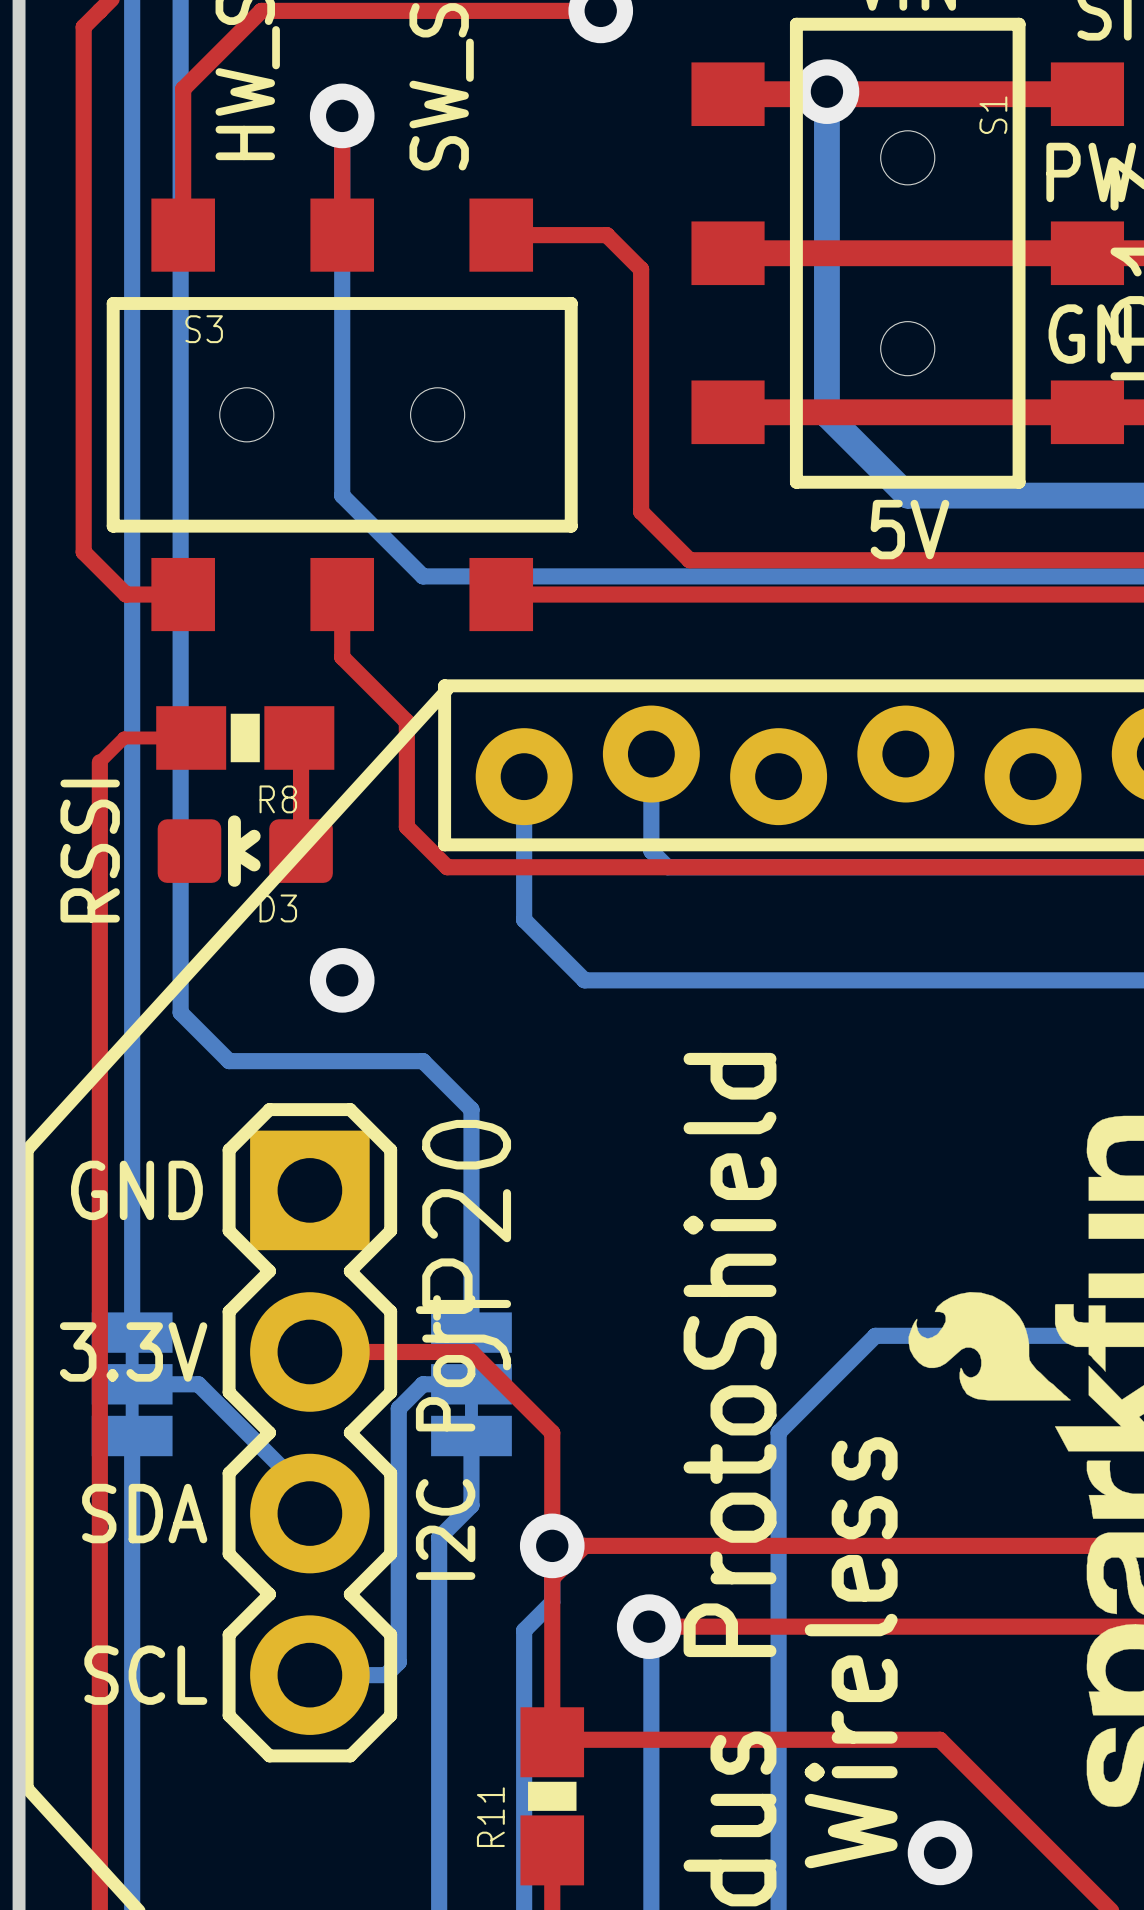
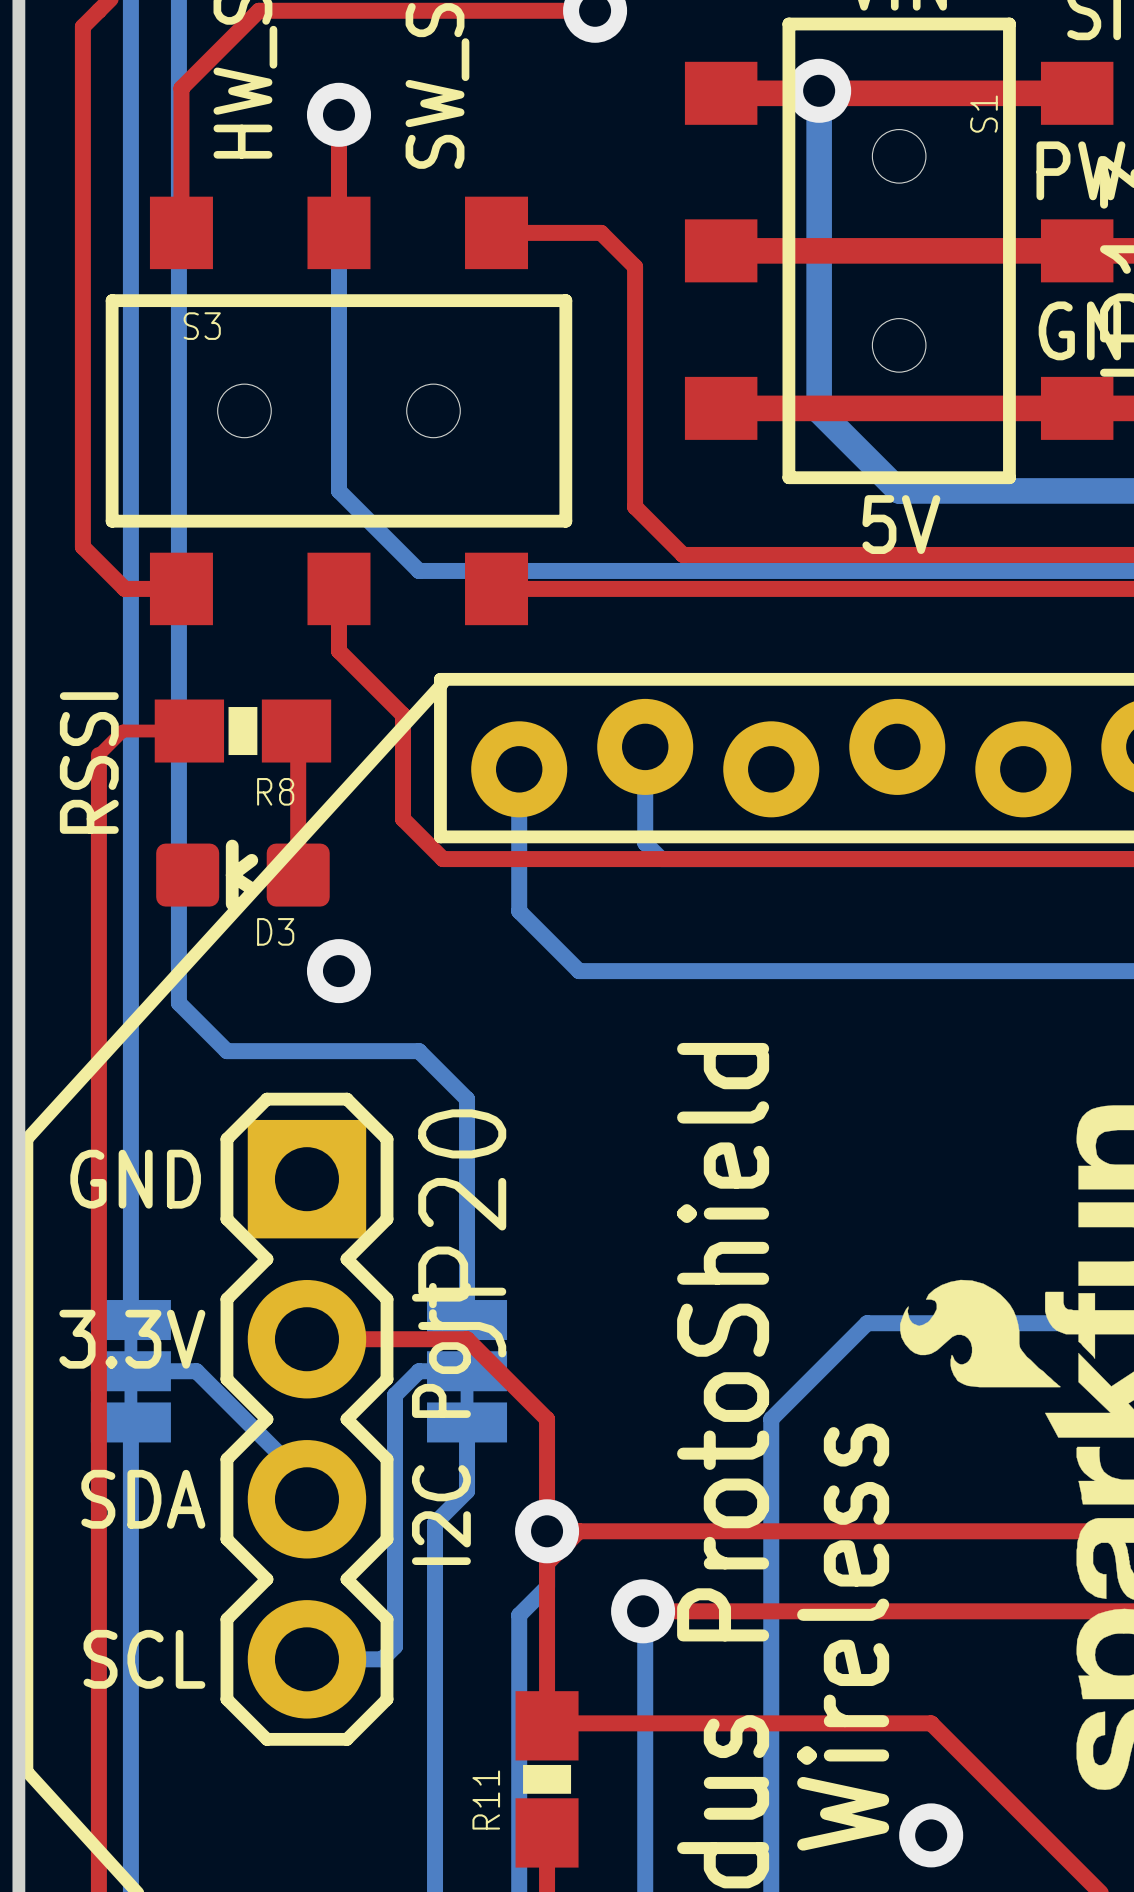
text position: RSSI (90, 851) -> RSSI (89, 763)
D3 position: (245, 851) -> (242, 875)

